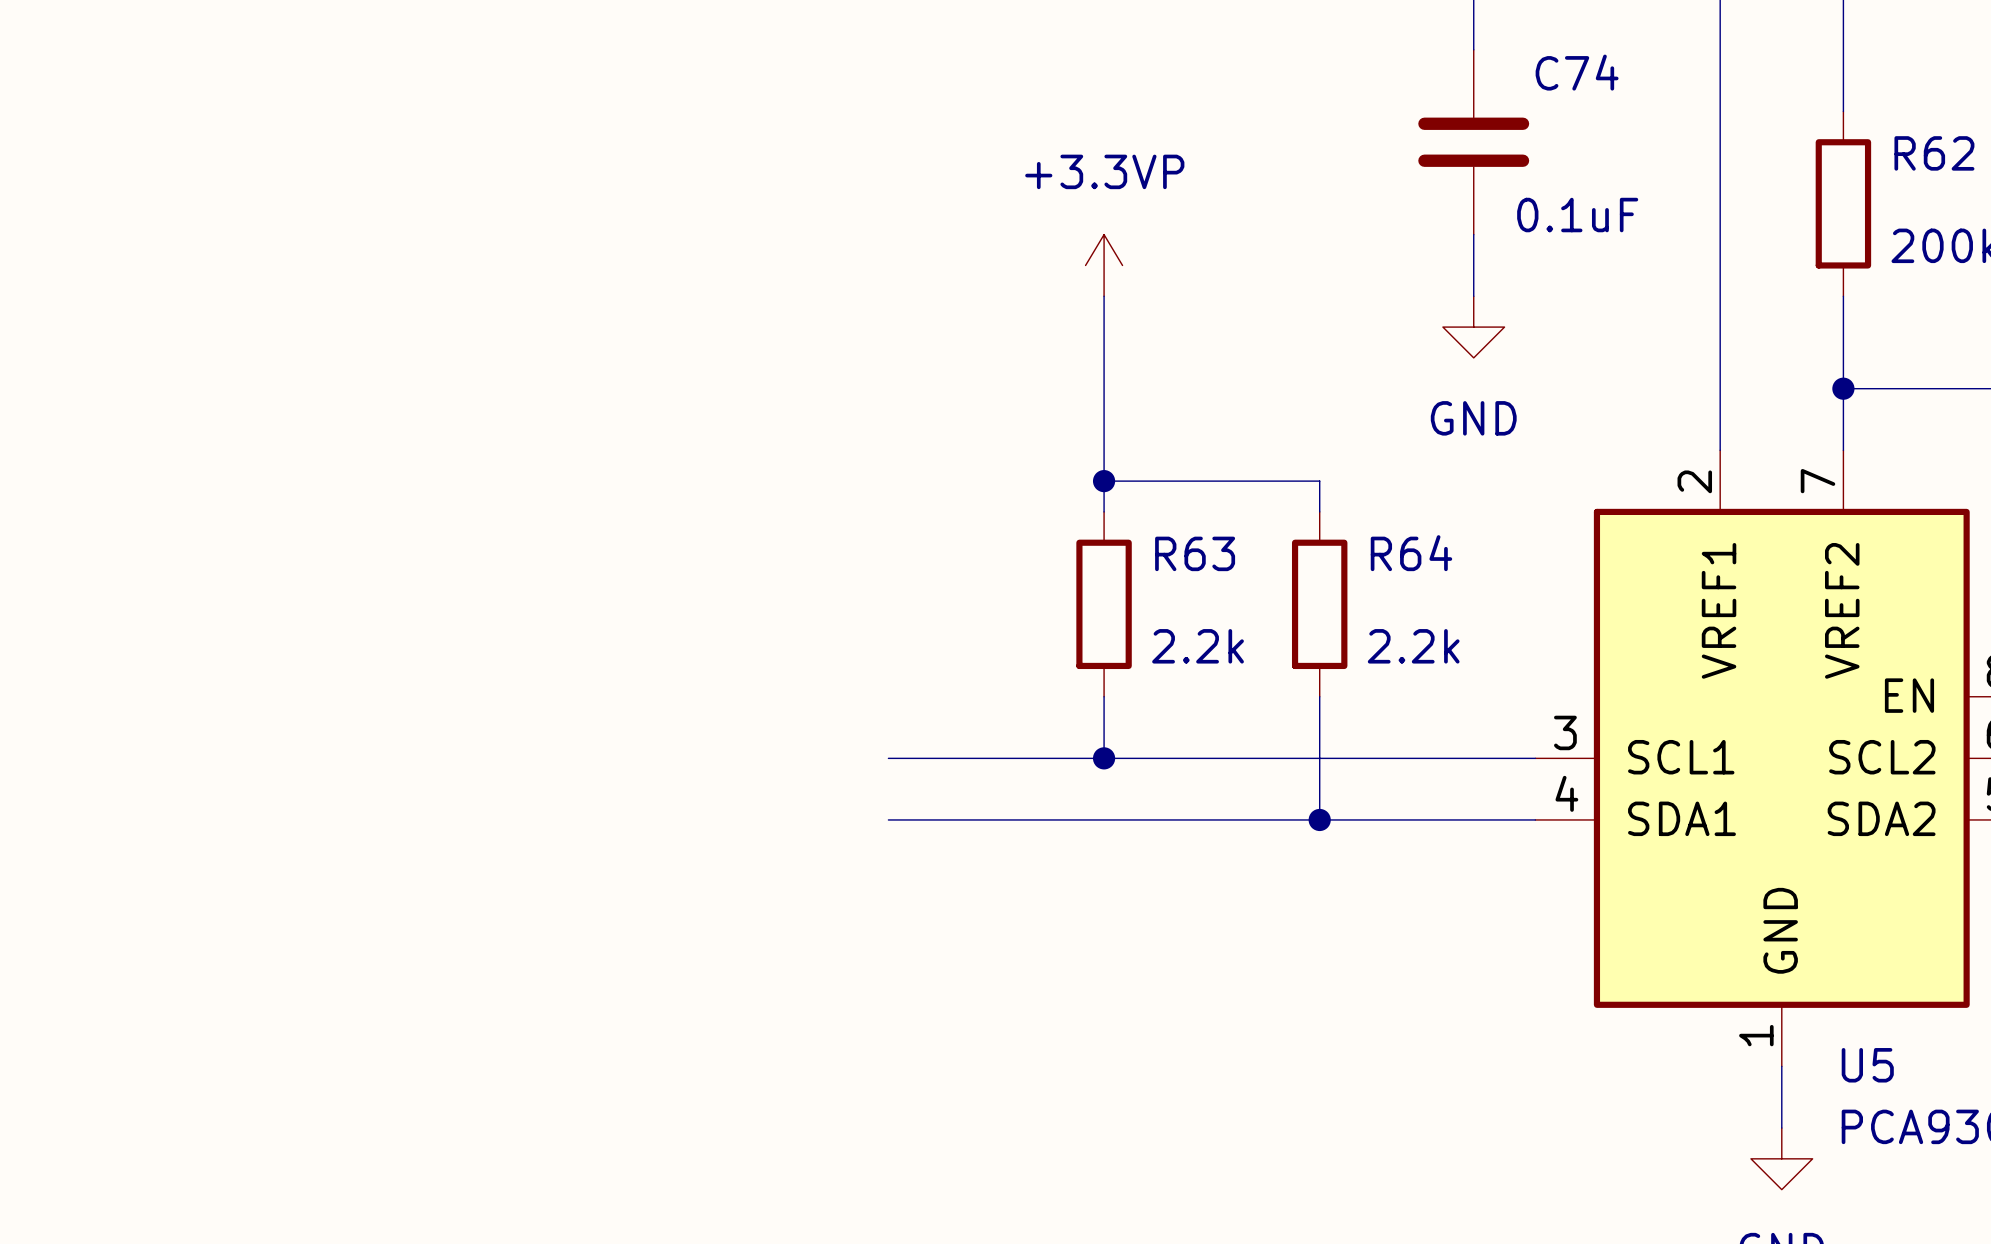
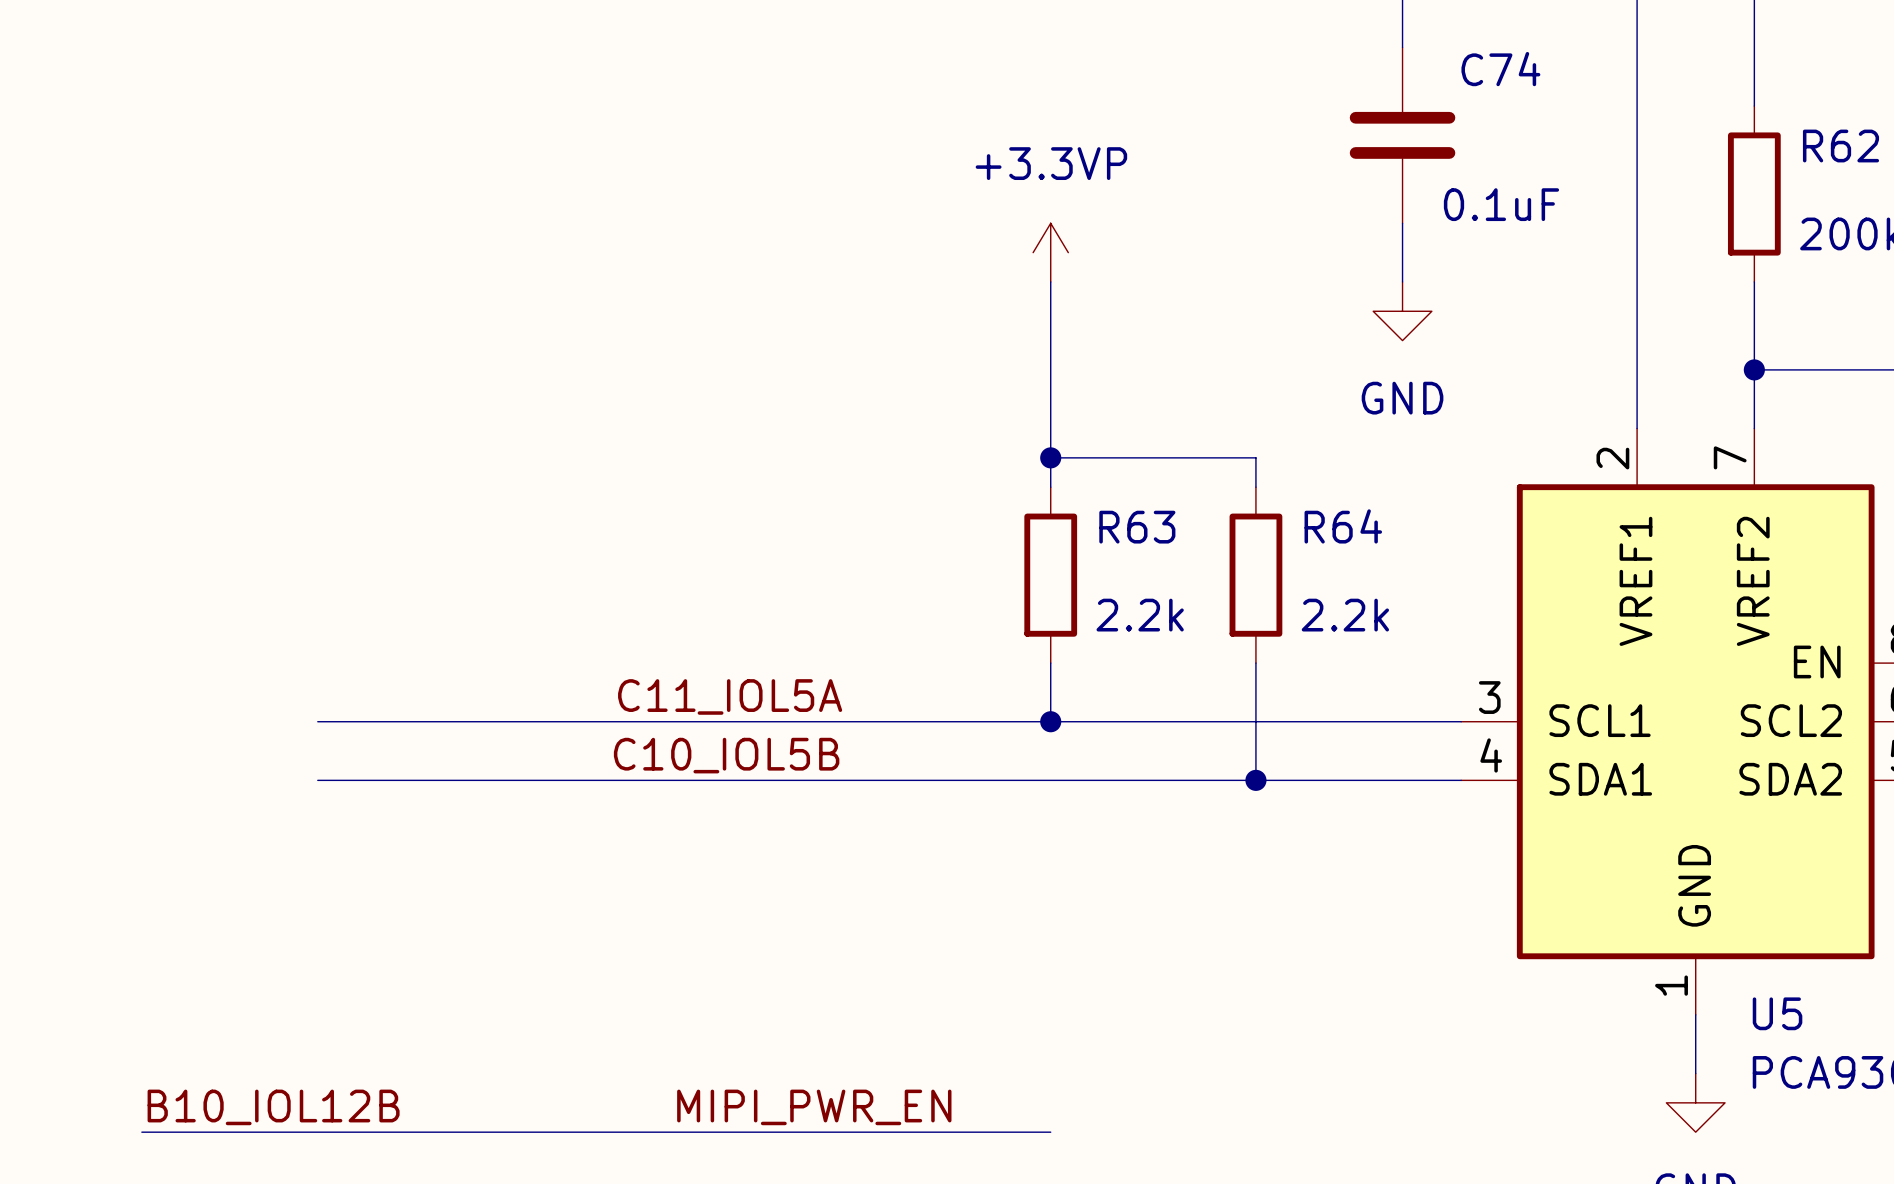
label: none -> C11_IOL5A (730, 696)
wire: none -> (317, 721) (845, 721)
label: none -> C10_IOL5B (726, 755)
wire: none -> (317, 780) (845, 780)
label: none -> B10_IOL12B (273, 1107)
label: none -> MIPI_PWR_EN (814, 1107)
wire: none -> (141, 1132) (1050, 1132)

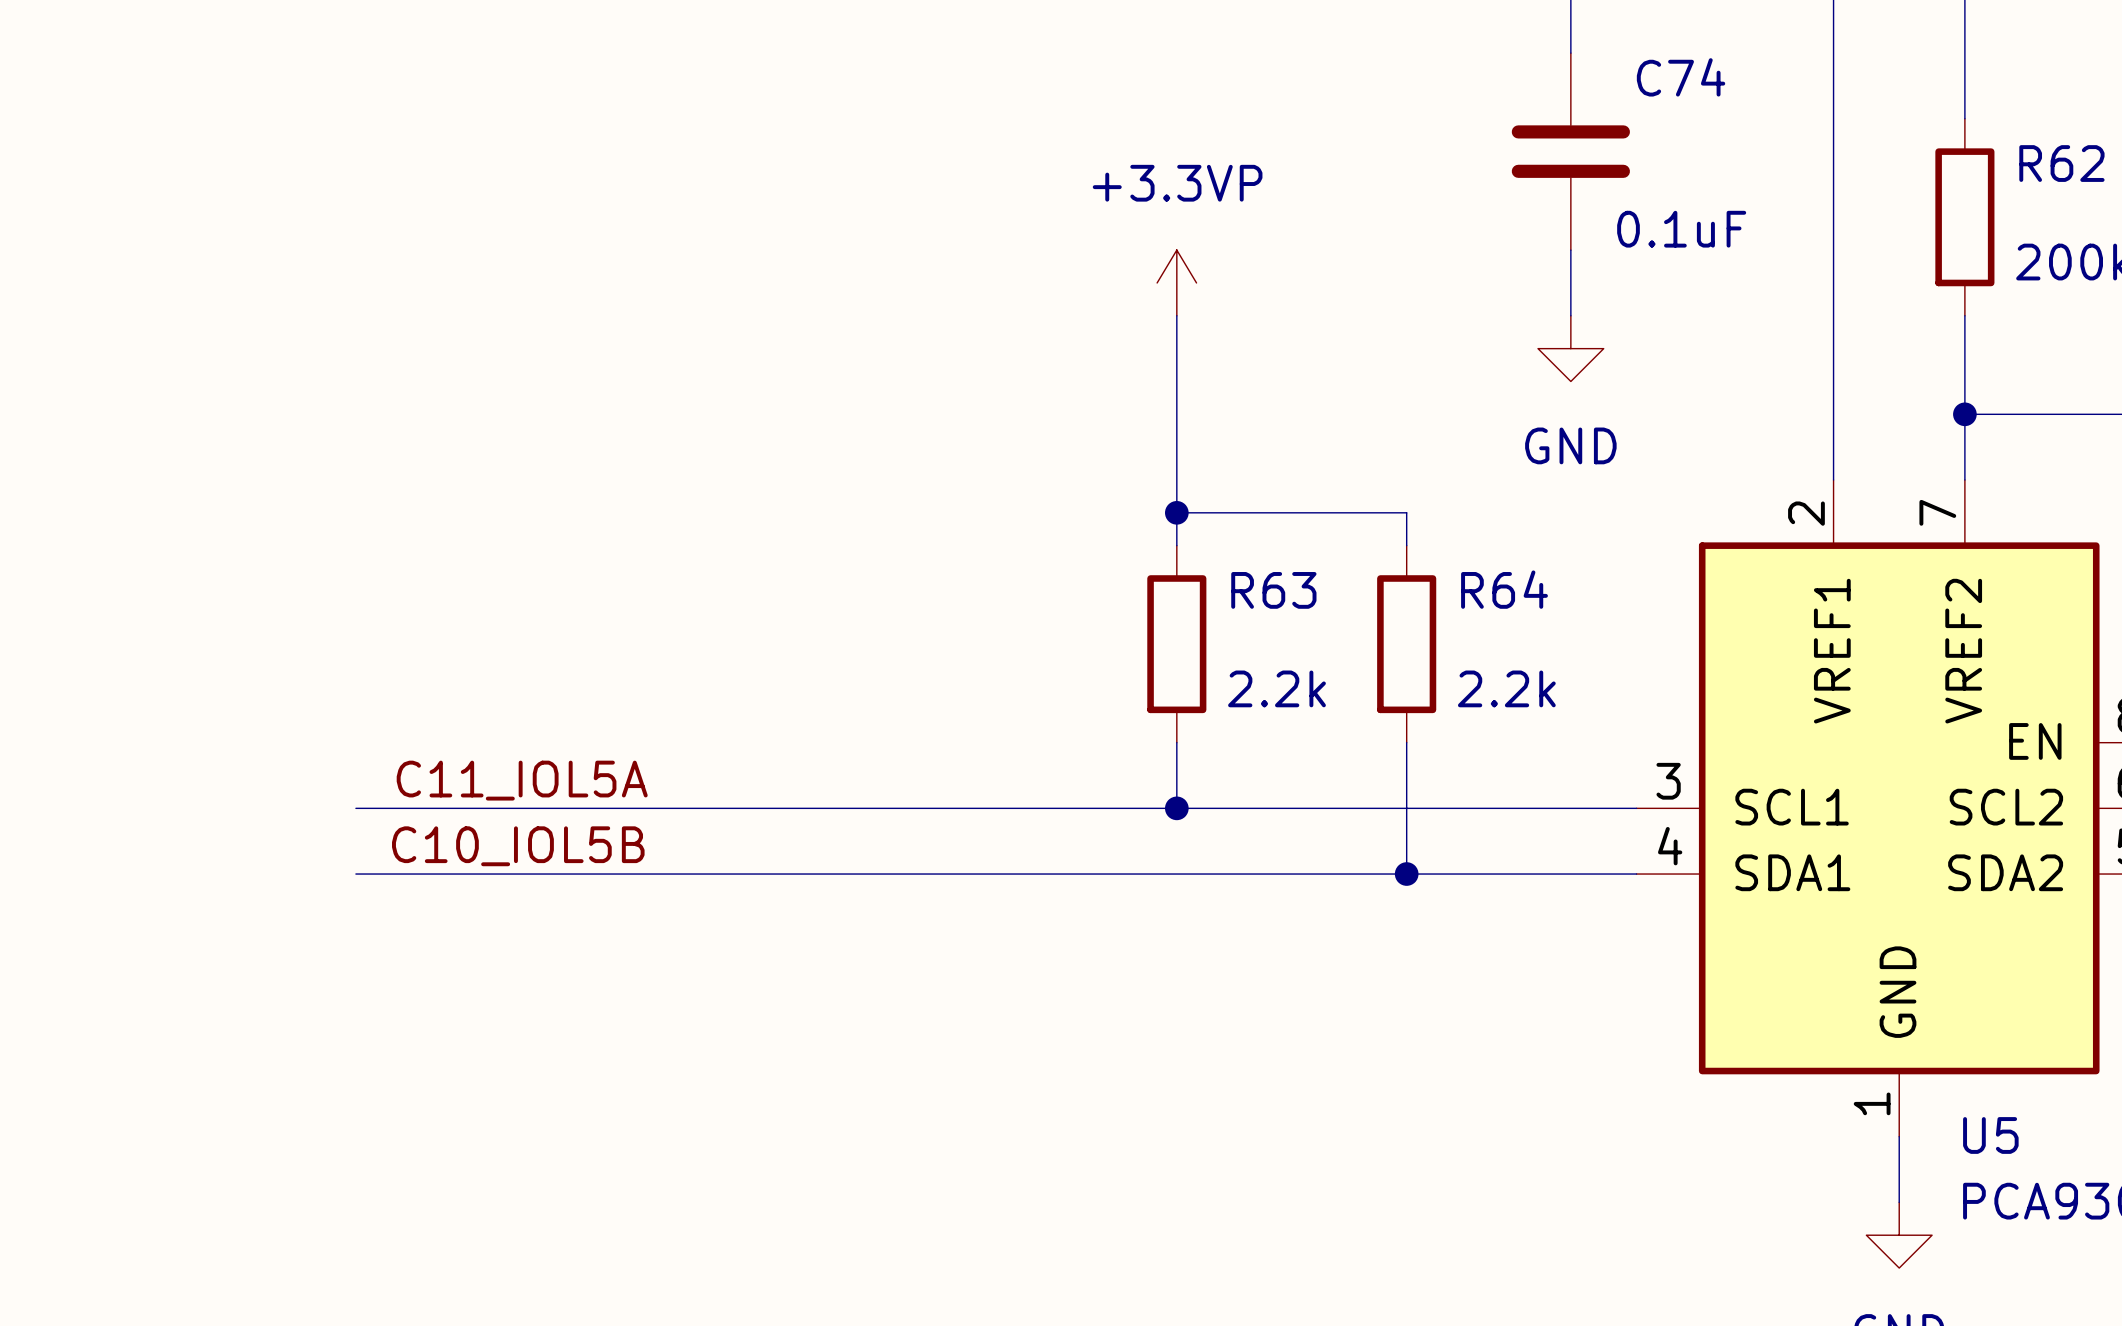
label position: C11_IOL5A (730, 696) -> C11_IOL5A (522, 780)
label position: C10_IOL5B (726, 755) -> C10_IOL5B (518, 846)
label: B10_IOL12B (273, 1107) -> none
label: MIPI_PWR_EN (814, 1107) -> none
wire: (141, 1132) (1050, 1132) -> none

